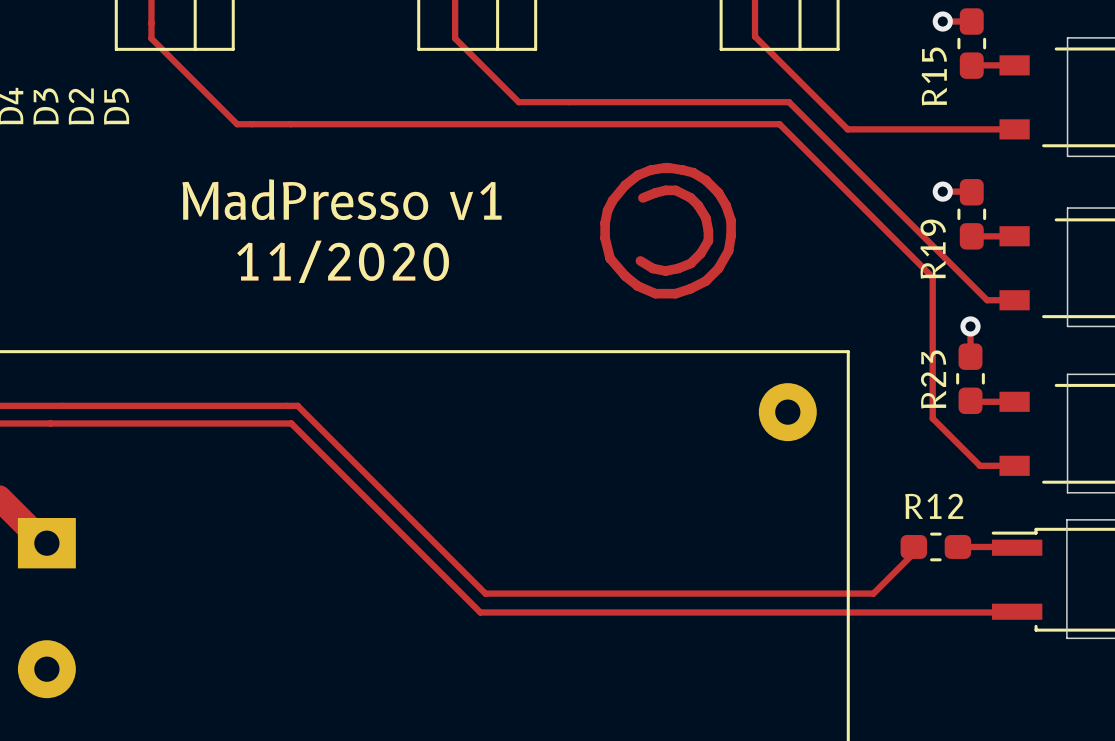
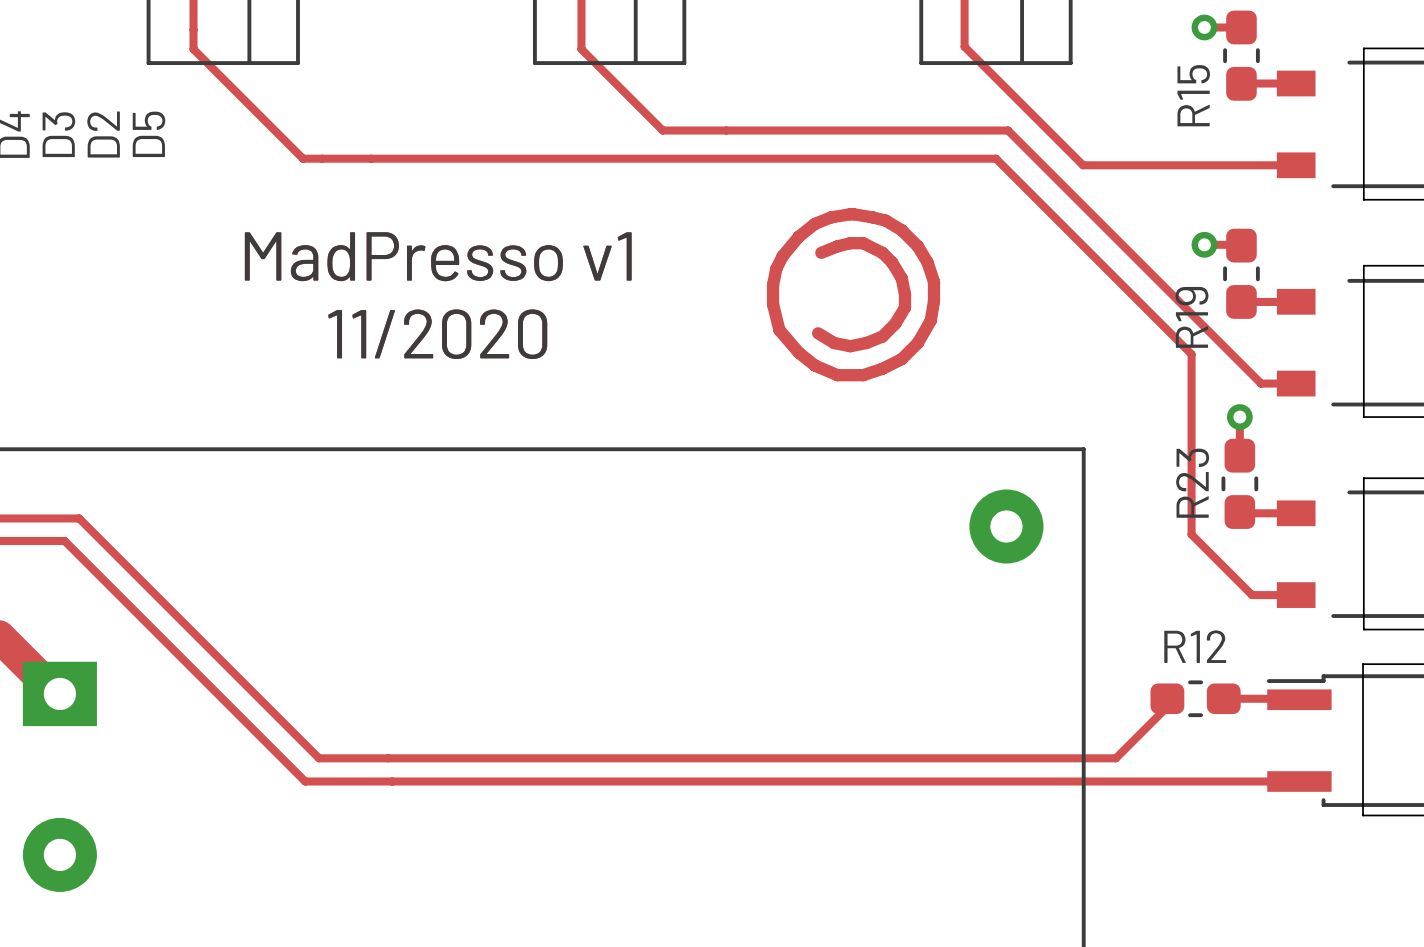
track: (62, 405) (297, 405) (485, 593) -> (79, 518) (319, 758) (620, 758)
track: (50, 423) (291, 423) (480, 612) (1019, 612) -> (64, 541) (305, 781) (1299, 781)

